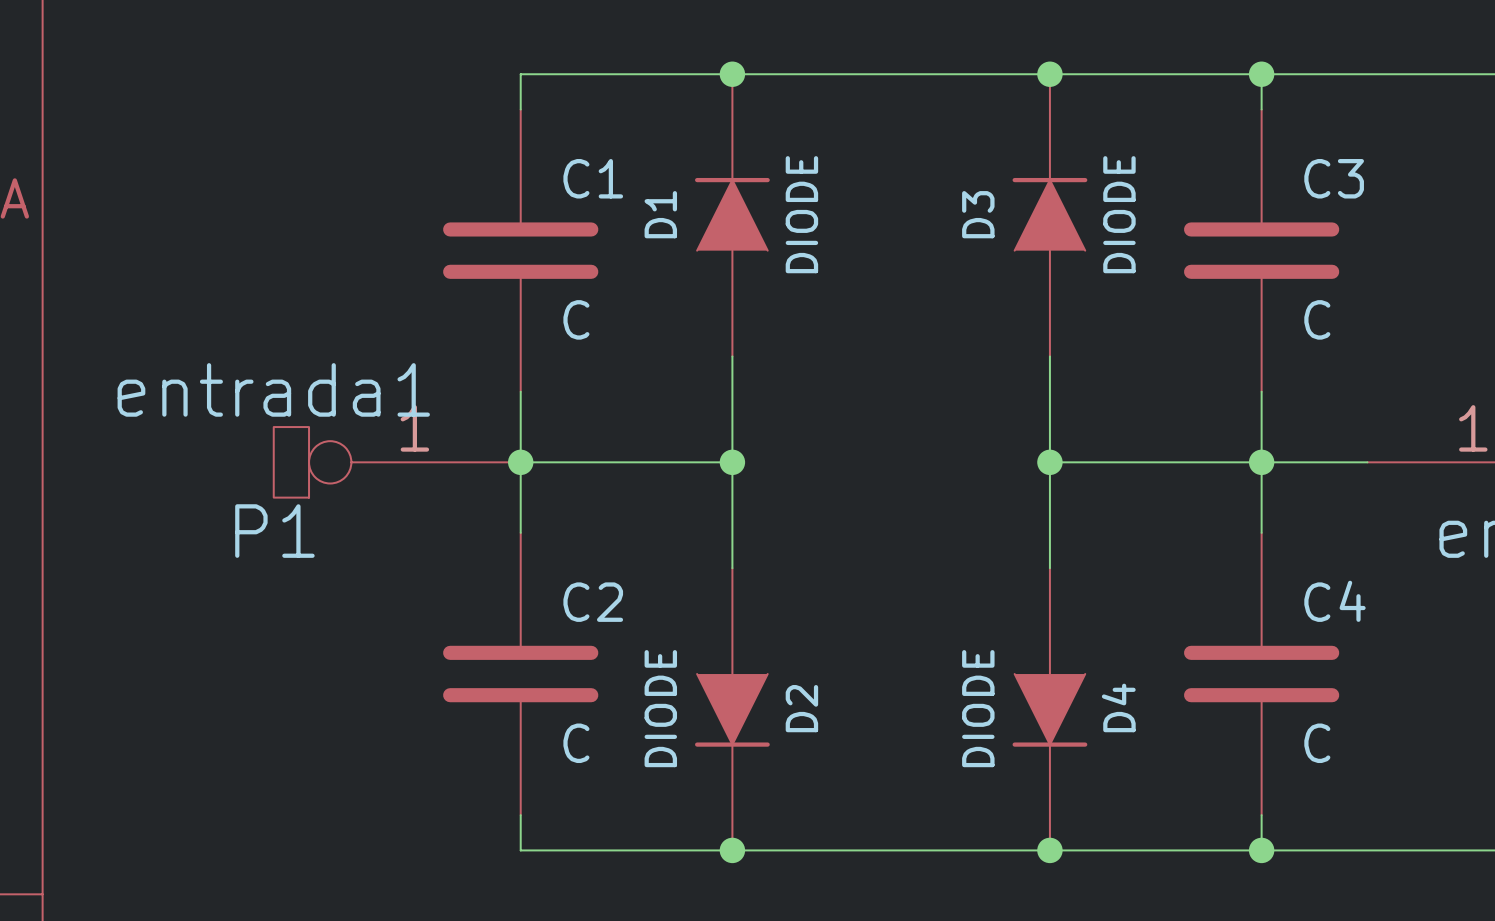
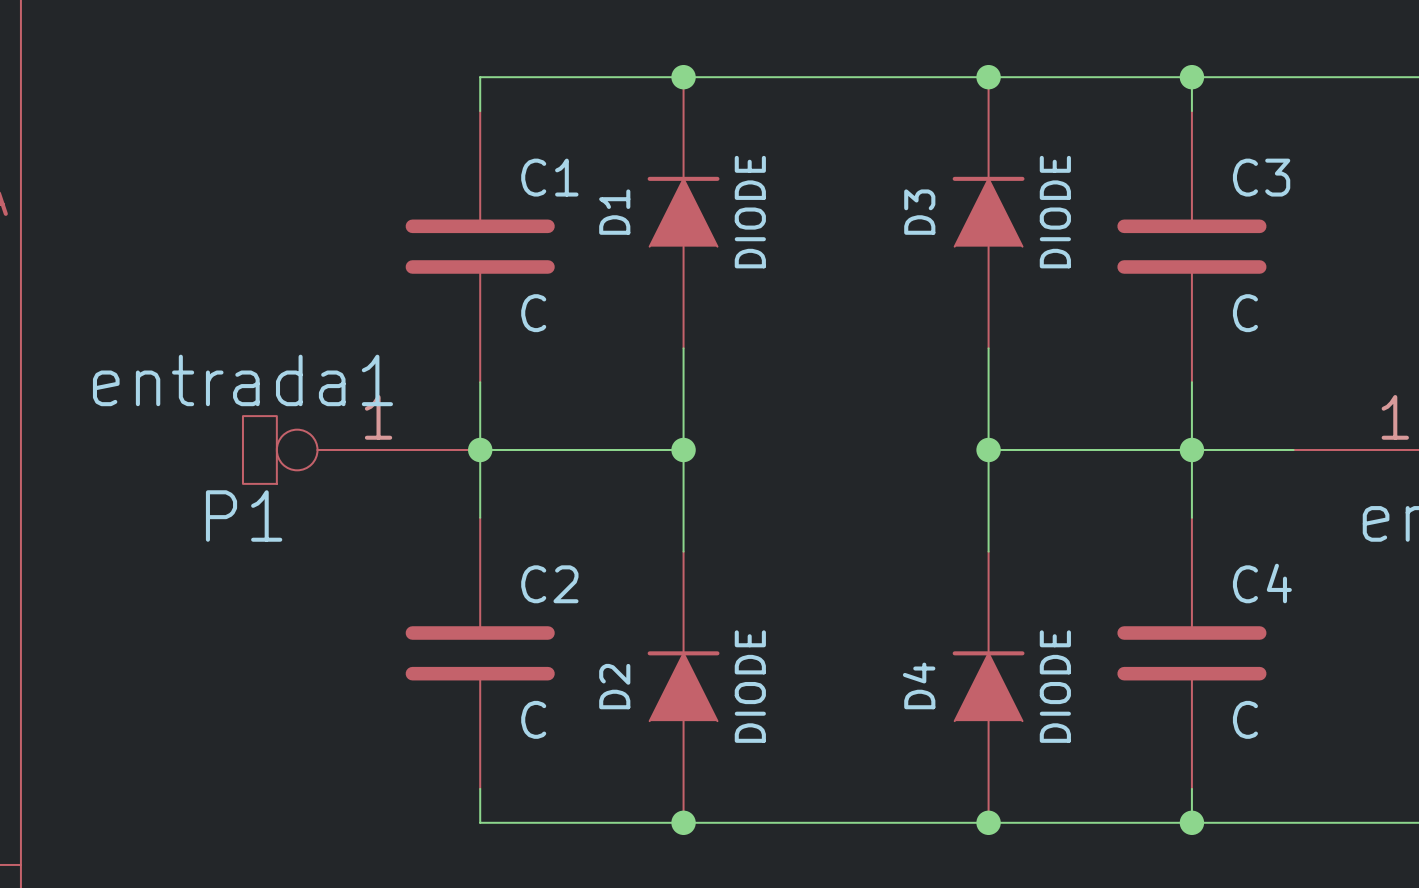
D2 rotation: 0° (732, 710) -> 180° (683, 686)
D4 rotation: 0° (1049, 710) -> 180° (988, 686)

